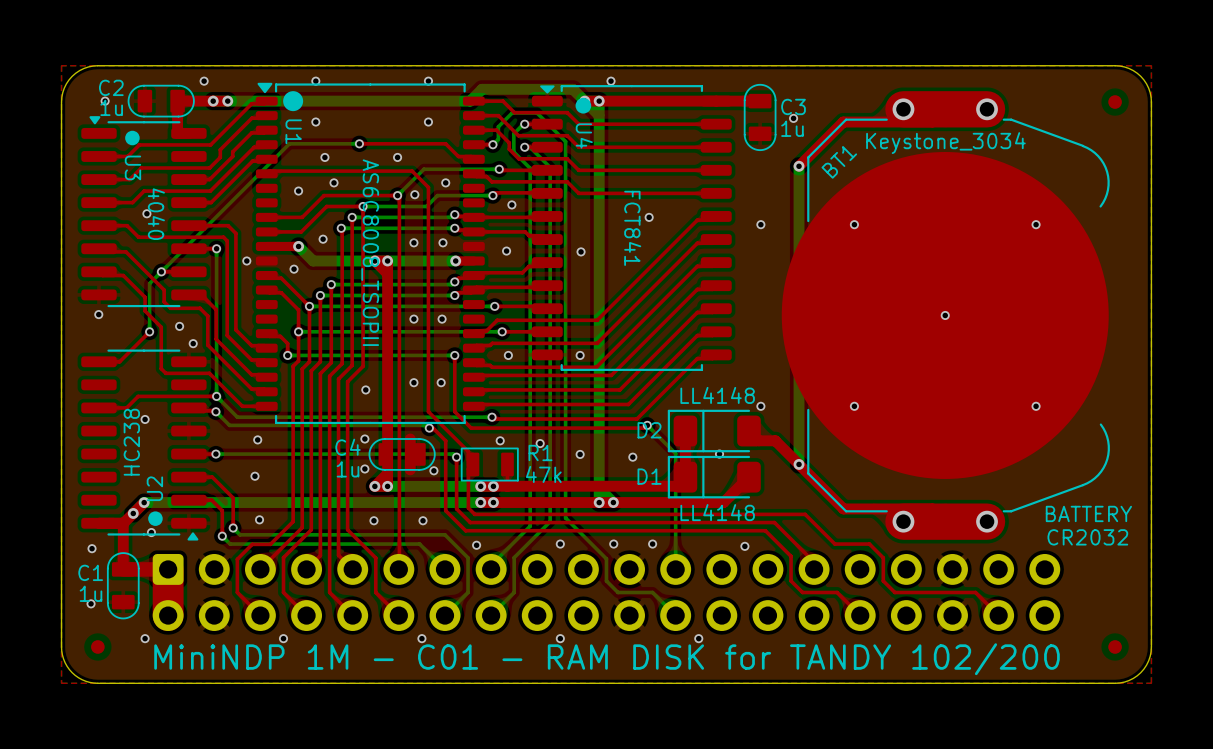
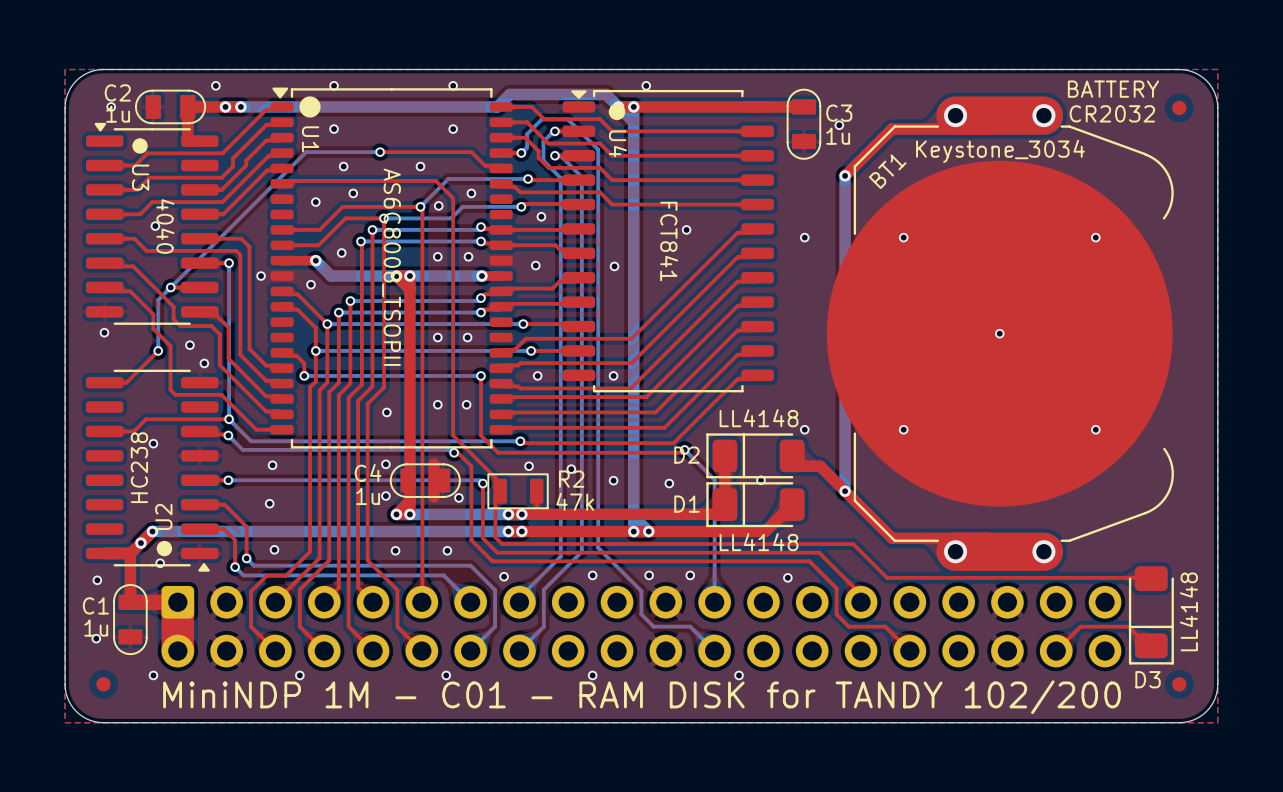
R1 name: R1 (540, 452) -> R2 (571, 479)
text position: BATTERY (1088, 513) -> BATTERY (1113, 89)
top track: (805, 514) (834, 544) (869, 544) (883, 557) (883, 580) (894, 592) (975, 592) (998, 615) -> (851, 544) (887, 577) (1151, 578)
text position: CR2032 (1087, 537) -> CR2032 (1112, 113)
D3: none -> LL4148 (1151, 615)
top track: none -> (1151, 645) (1147, 645) (1128, 626) (1080, 626) (1056, 651)

